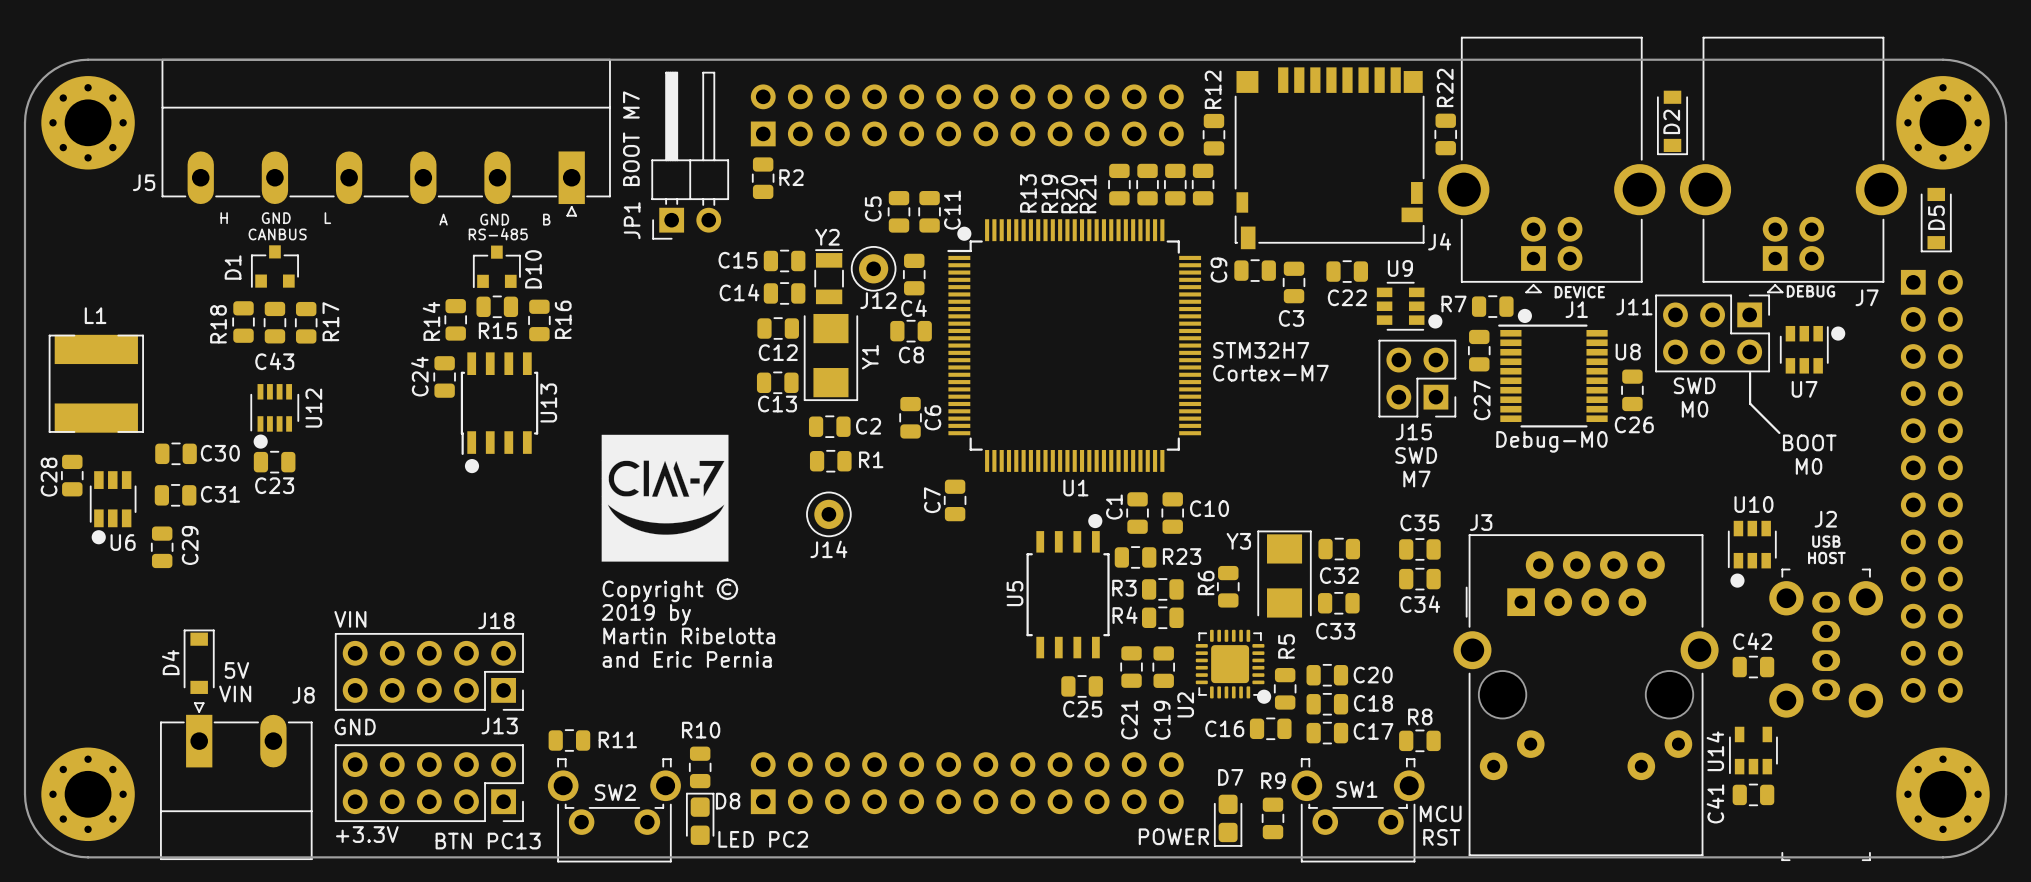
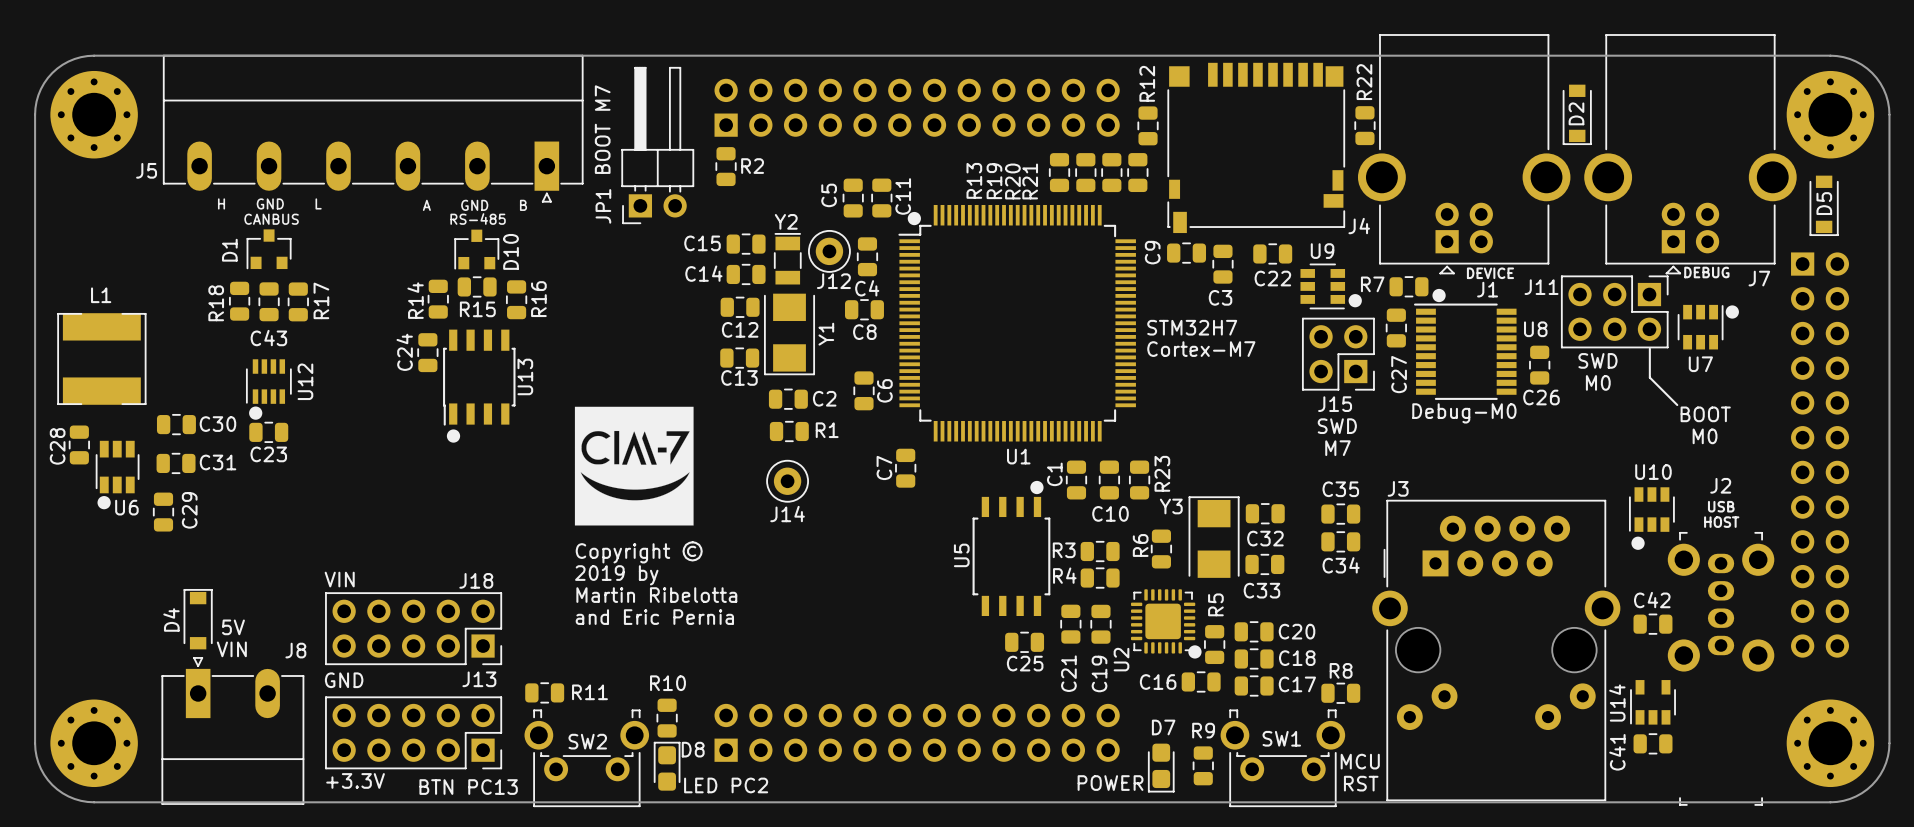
C10 name position: C10 (1209, 508) -> C10 (1110, 513)
R23 rotation: 0° (1135, 557) -> 90° clockwise (1139, 480)
R23 position: (1135, 557) -> (1139, 480)

